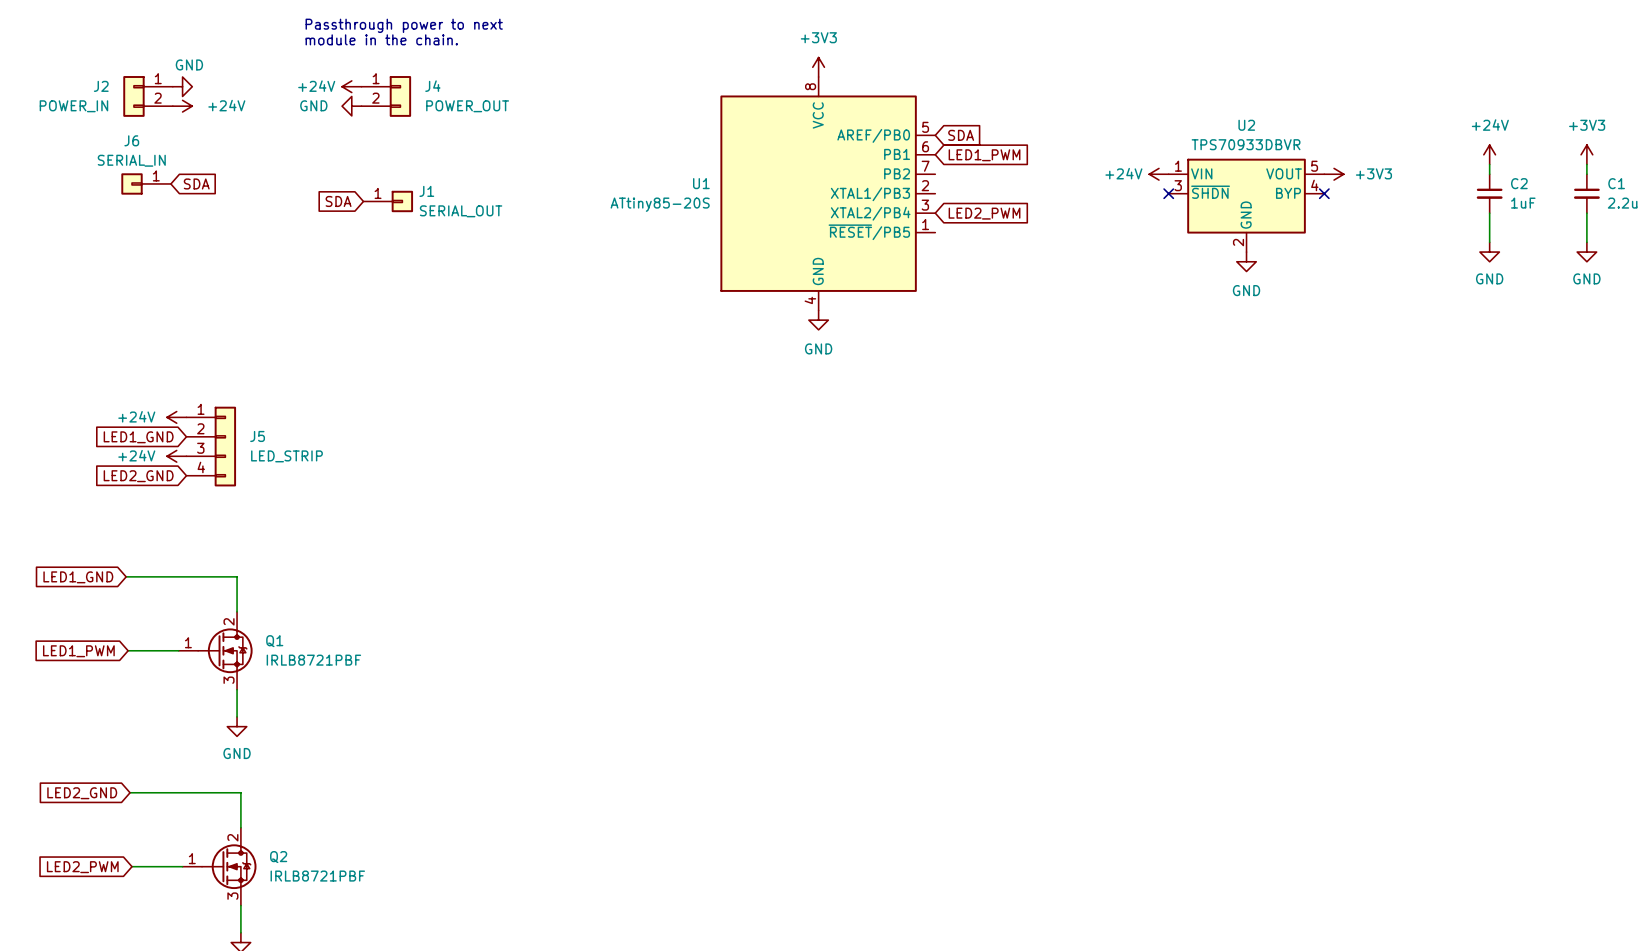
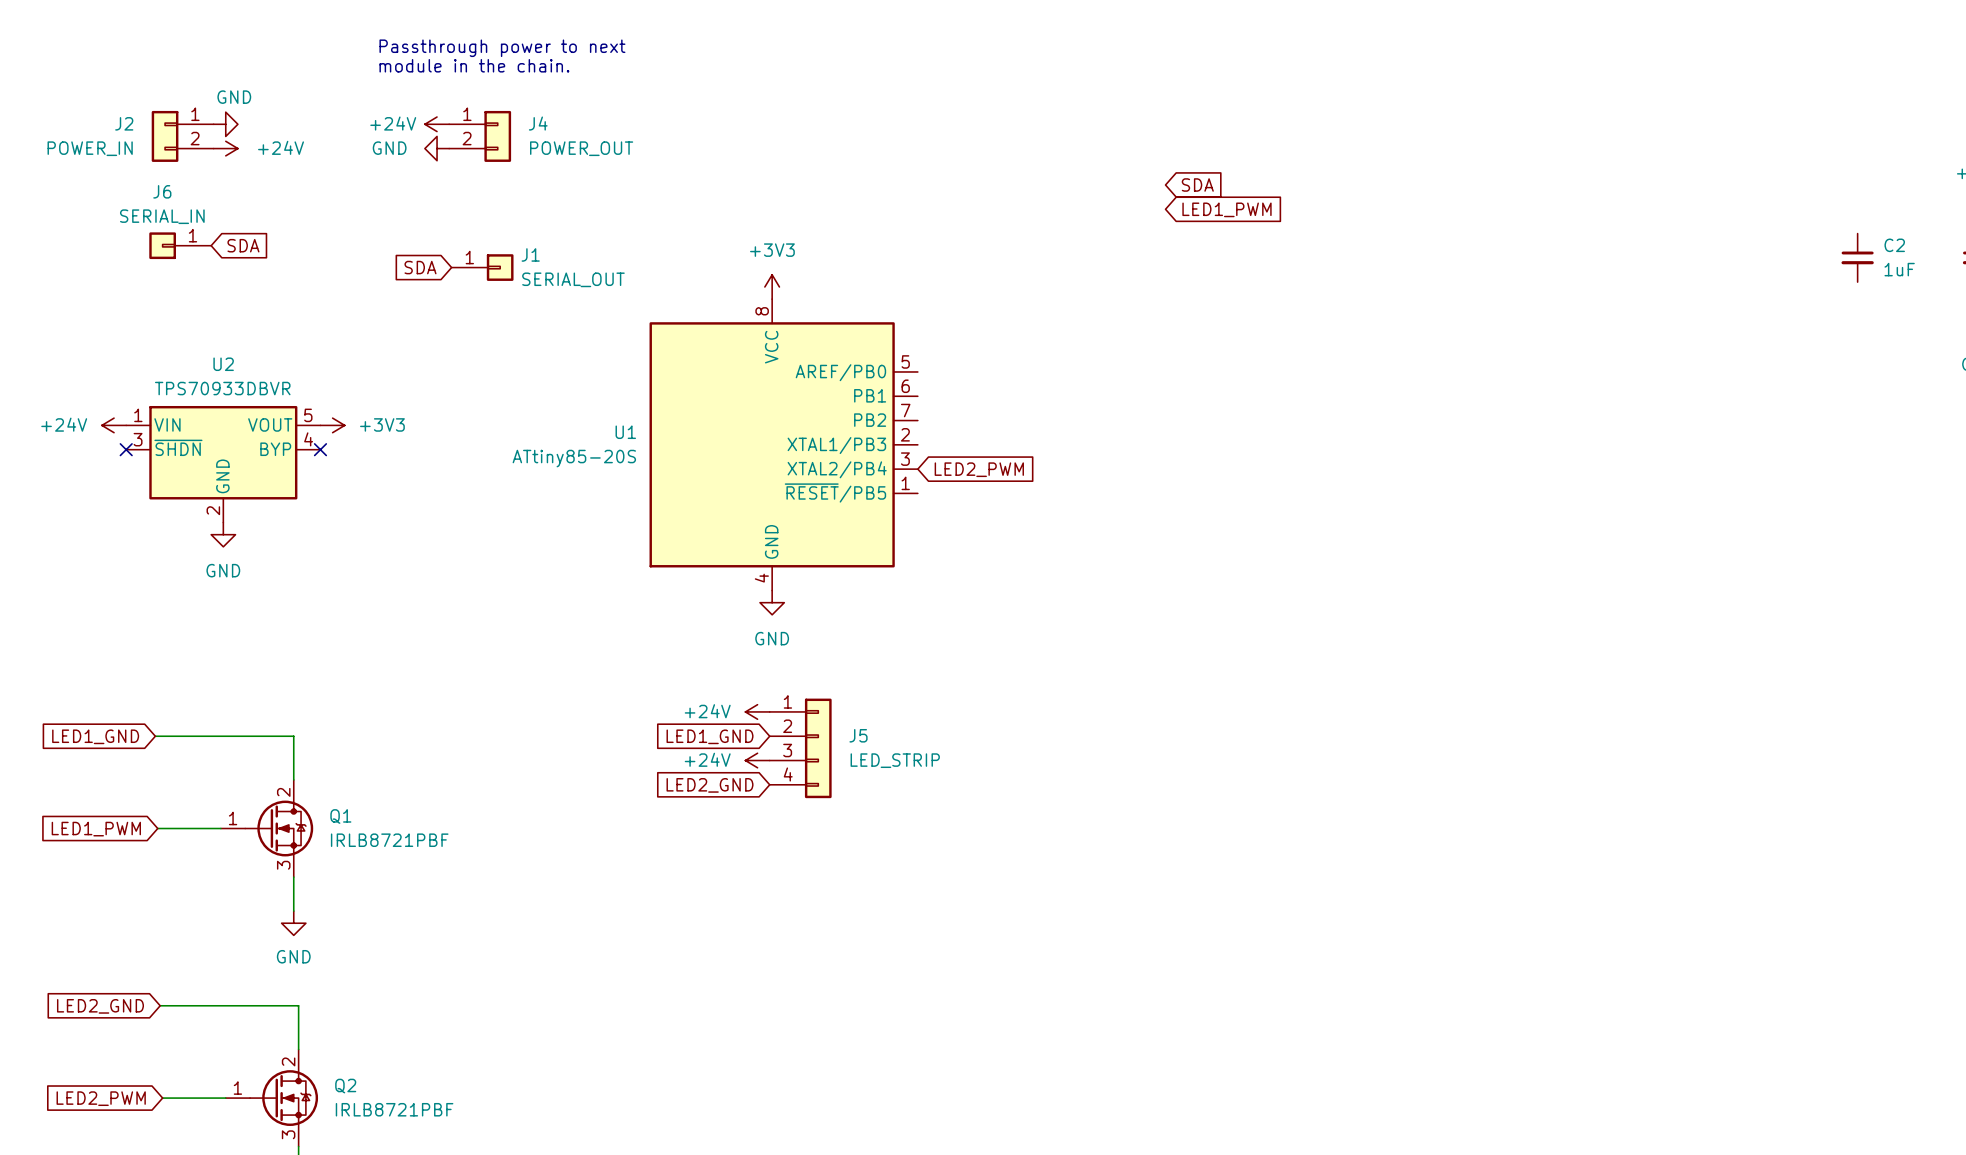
power symbol: +3V3 (818, 67) -> none
power symbol: +24V (1489, 154) -> none
wire: (1489, 164) (1489, 174) -> none
power symbol: +24V (1158, 174) -> none
power symbol: +3V3 (1334, 174) -> none
U1 position: (827, 193) -> (783, 444)
no-connect mark: (1168, 193) -> none
no-connect mark: (1324, 193) -> none
U2 position: (1246, 205) -> (223, 464)
global label: LED2_PWM (984, 213) -> none
wire: (1489, 213) (1489, 242) -> none
power symbol: none -> +3V3 (772, 286)
power symbol: GND (1489, 252) -> none
power symbol: GND (1246, 261) -> none
power symbol: GND (818, 320) -> none
power symbol: none -> +3V3 (332, 425)
no-connect mark: none -> (126, 449)
no-connect mark: none -> (320, 449)
global label: none -> LED2_PWM (979, 469)
power symbol: +24V (176, 417) -> GND (223, 534)
global label: LED1_GND (138, 437) -> none
J5 position: (211, 446) -> (800, 748)
power symbol position: +24V (176, 456) -> +24V (114, 425)
power symbol: none -> GND (772, 602)
global label: LED2_GND (138, 476) -> none
power symbol: none -> +24V (757, 711)
global label: none -> LED1_GND (710, 736)
power symbol: none -> +24V (757, 760)
global label: none -> LED2_GND (710, 785)

